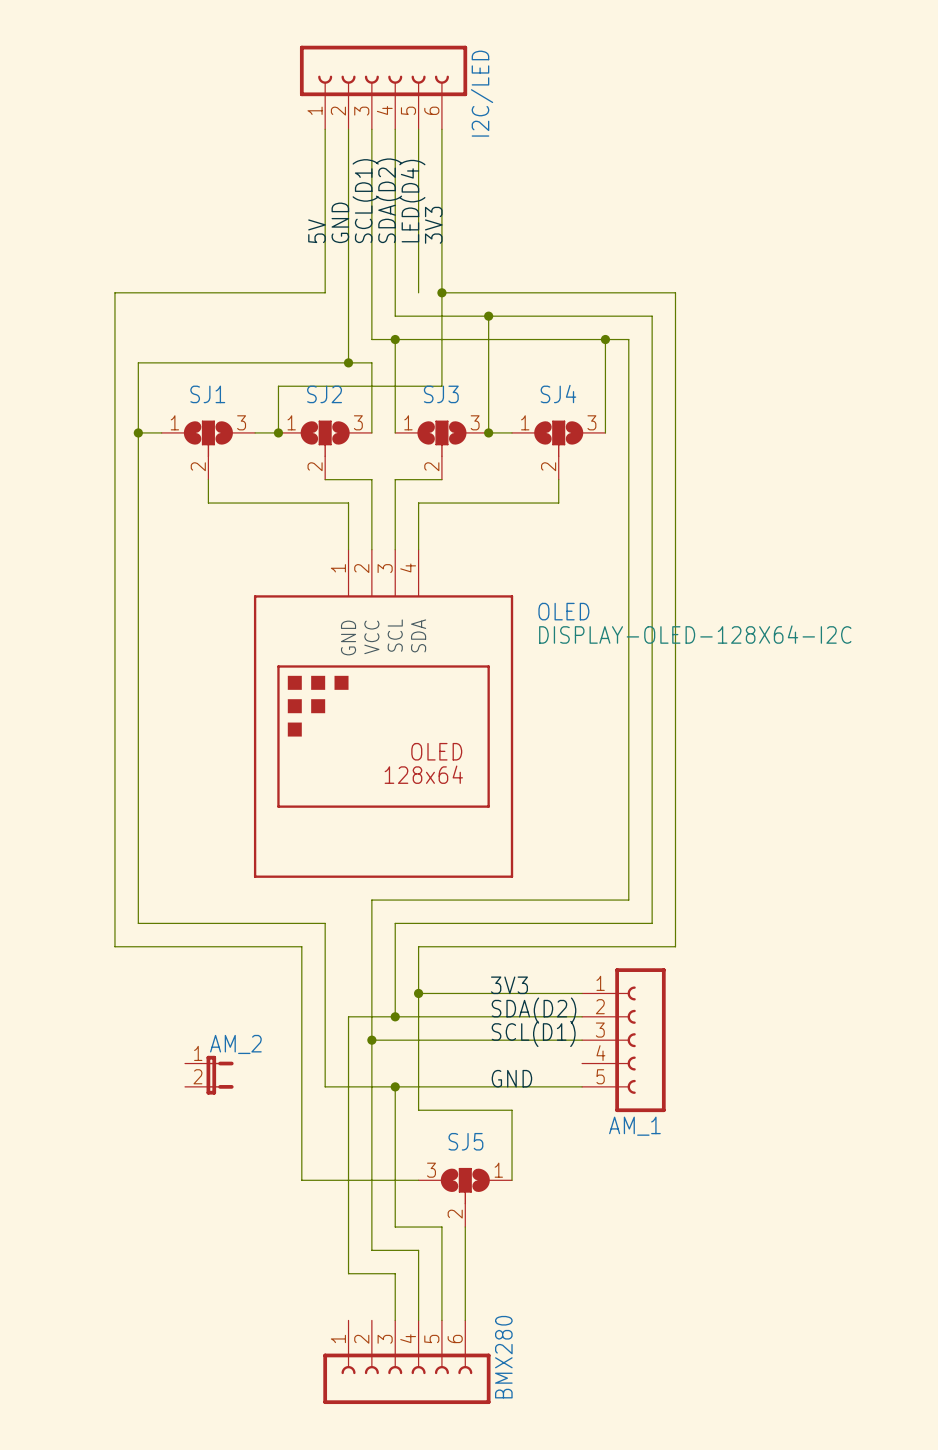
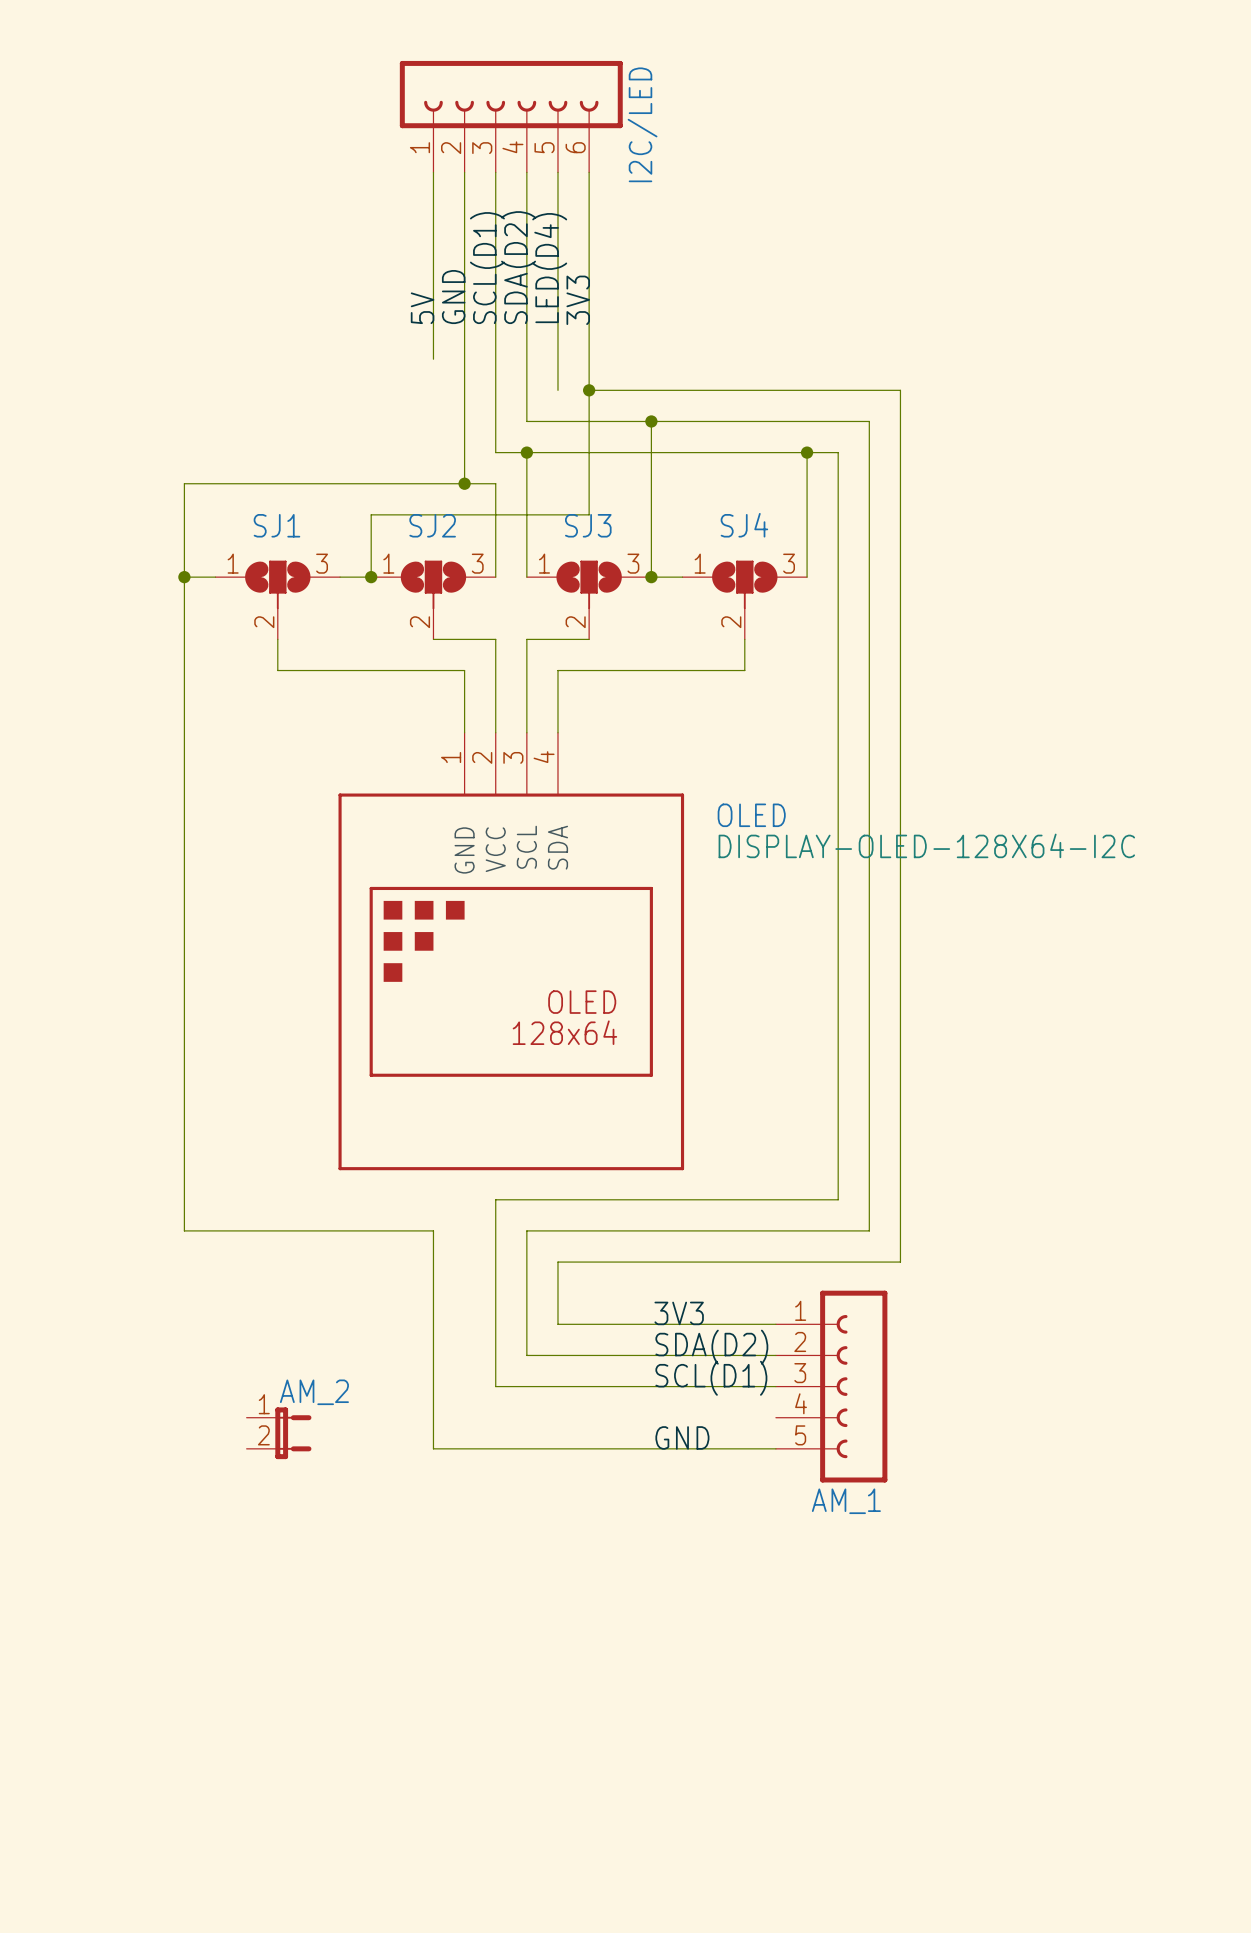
wire: (325, 269) (325, 292) (114, 292) (114, 946) (301, 946) (301, 1180) (418, 1180) -> none
wire: (418, 993) (418, 1110) (512, 1110) (512, 1180) -> none
junction: (418, 993) -> none
wire: (395, 1016) (348, 1016) (348, 1273) (395, 1273) (395, 1320) -> none
junction: (395, 1016) -> none
wire: (371, 1040) (371, 1250) (418, 1250) (418, 1320) -> none
junction: (371, 1040) -> none
wire: (395, 1086) (395, 1227) (441, 1227) (441, 1320) -> none
junction: (395, 1086) -> none
SJ5: (465, 1197) -> none
wire: (465, 1227) (465, 1320) -> none
BMX280: (406, 1362) -> none

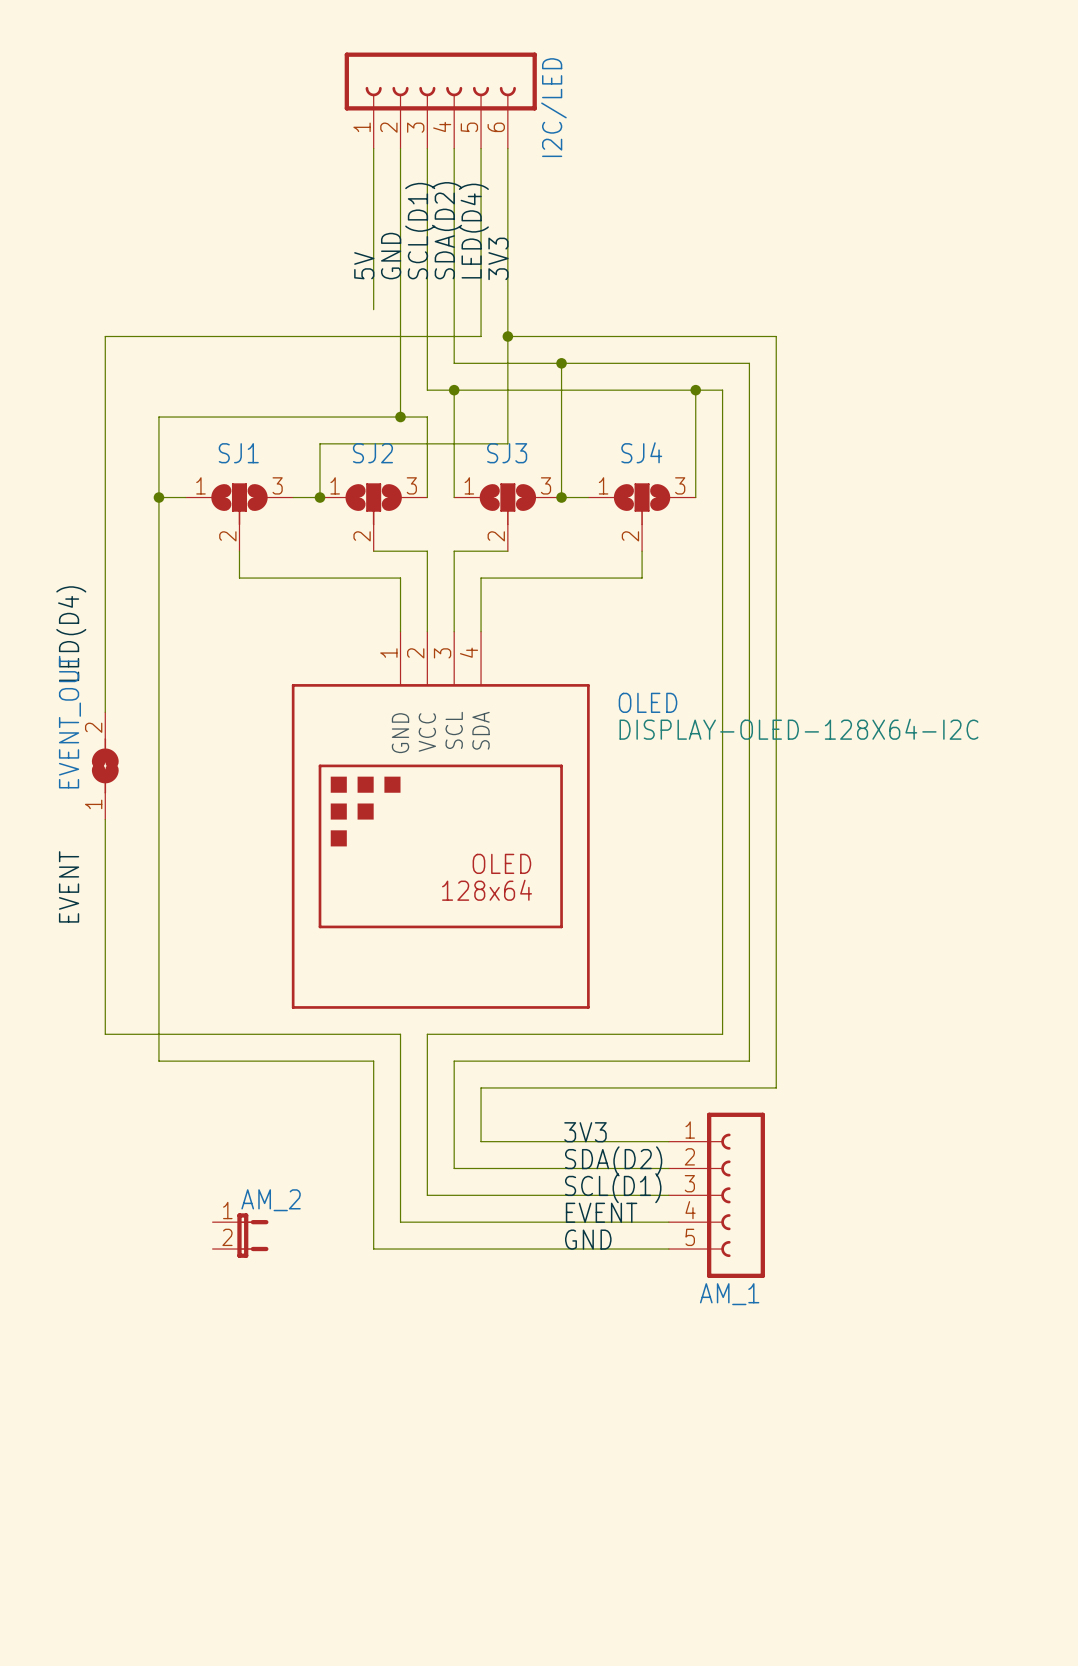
wire: none -> (481, 336) (105, 336) (105, 712)
label: none -> LED(D4) (71, 633)
EVENT_OUT: none -> (105, 765)
wire: none -> (105, 819) (105, 1034) (400, 1034) (400, 1222) (668, 1222)
label: none -> EVENT (69, 886)
label: none -> EVENT (601, 1212)

